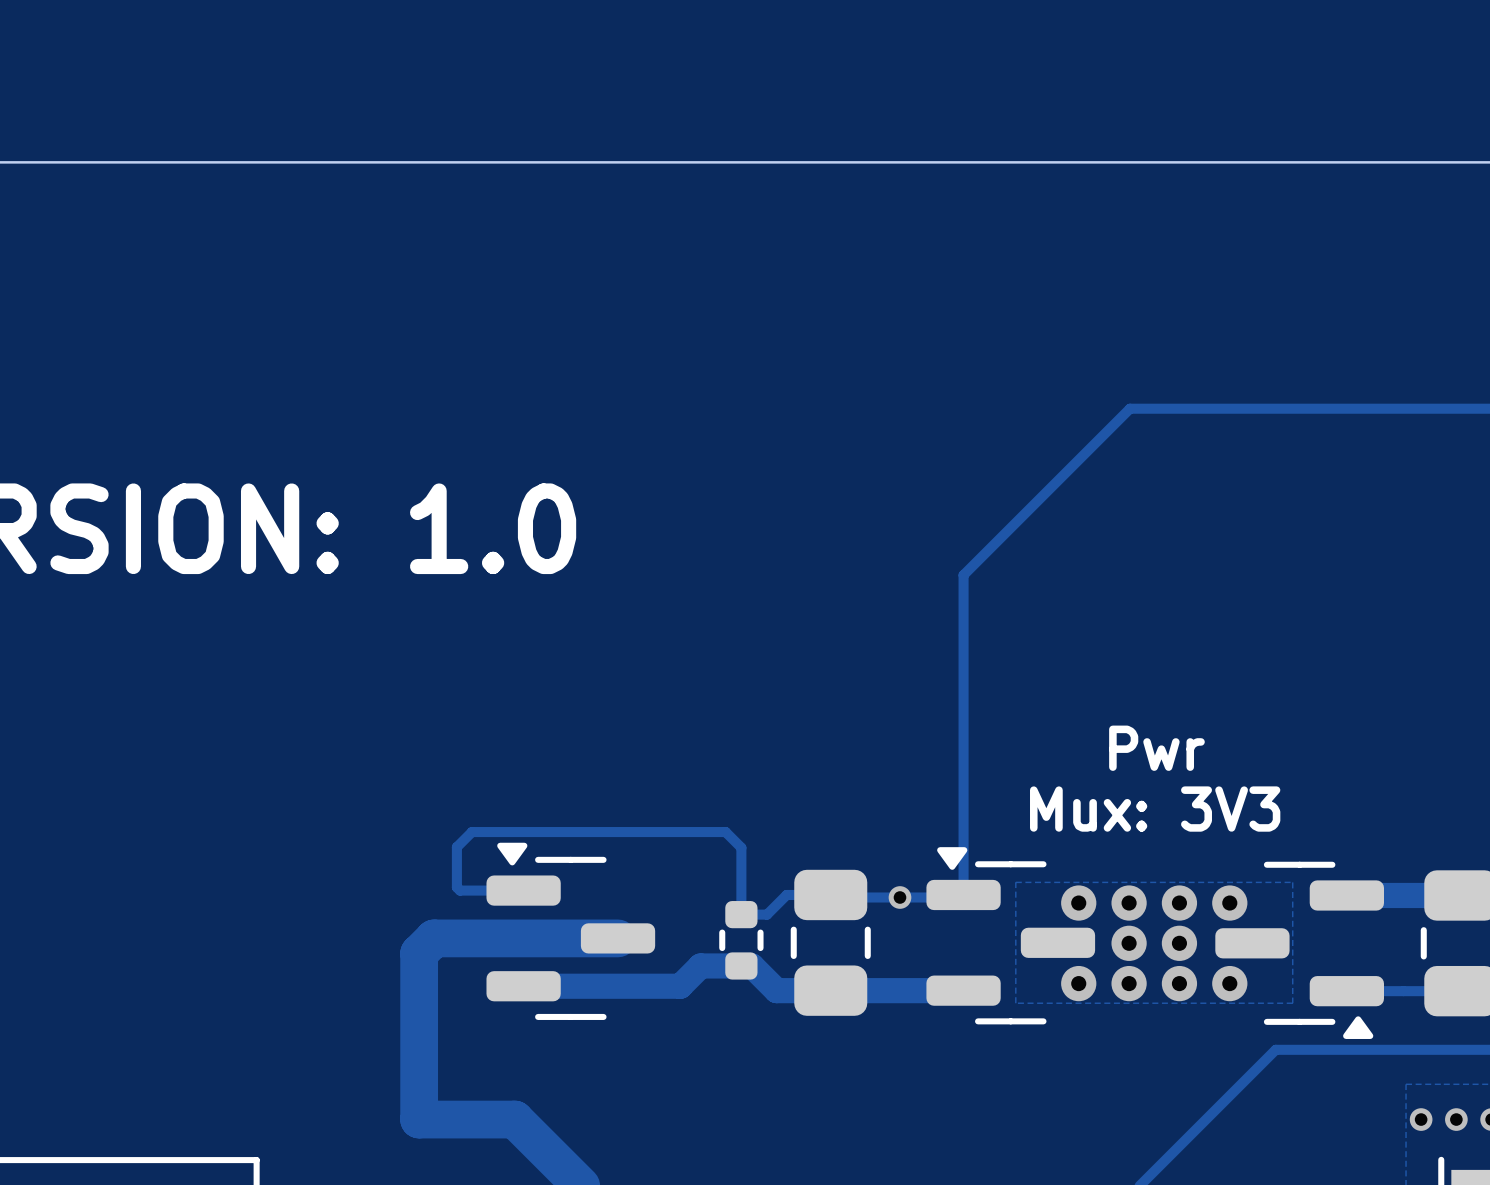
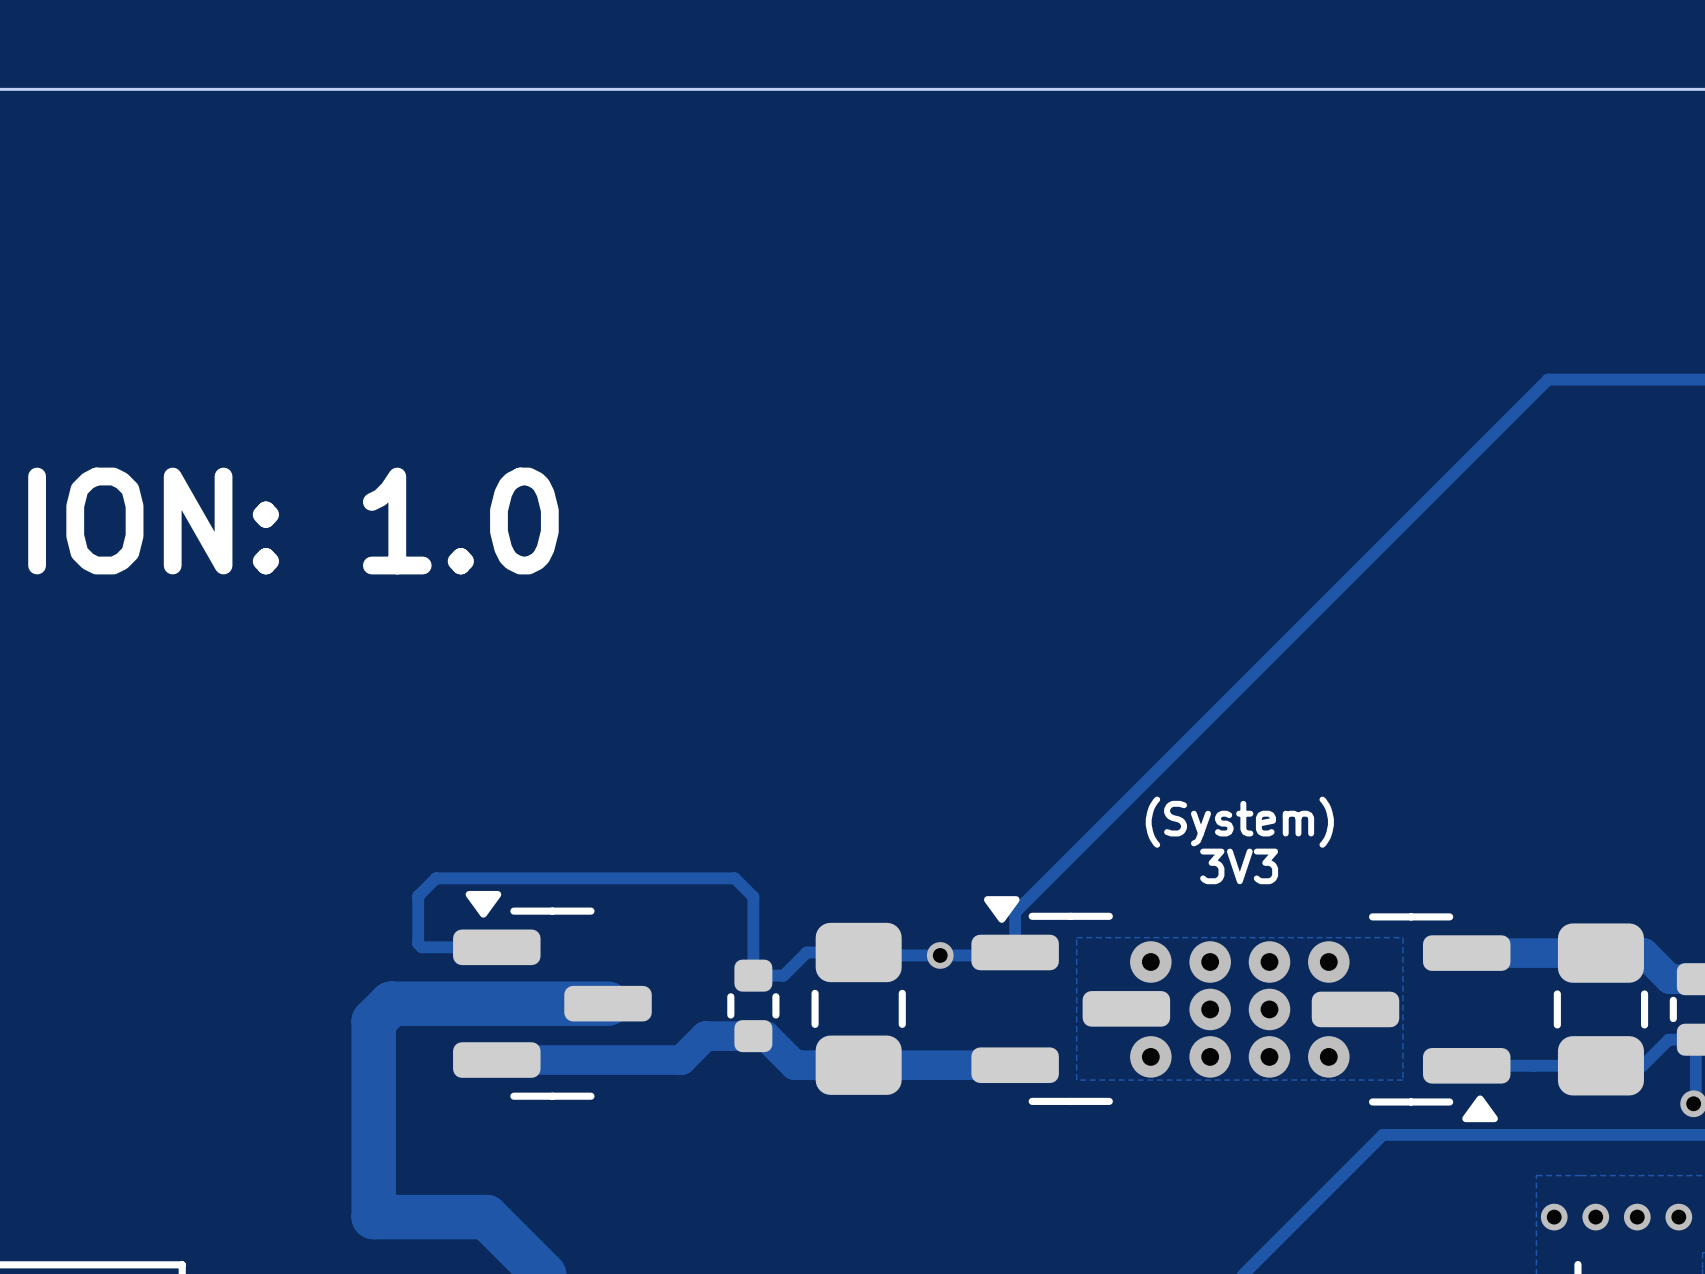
track: (1415, 408) (1129, 408) (963, 575) (963, 860) -> (1548, 379) (1015, 912)
text: Pwr (1156, 748) -> none
text: none -> (System) (1239, 822)
text: Mux: 3V3 (1155, 809) -> 3V3 (1239, 866)

